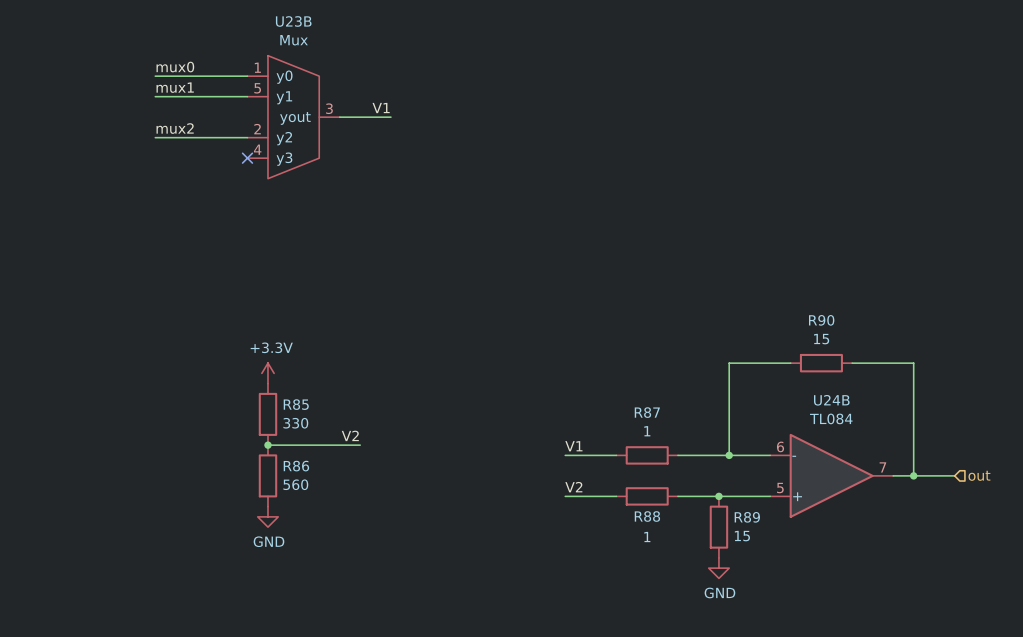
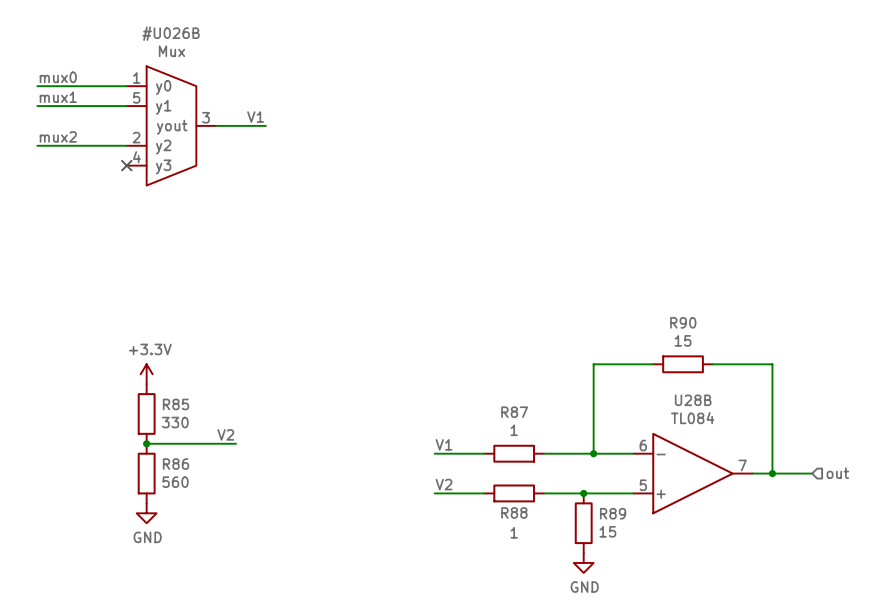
U23B: Mux (293, 117) -> none
#U026B: none -> Mux (171, 125)
U24B name: U24B (831, 400) -> U28B (693, 400)

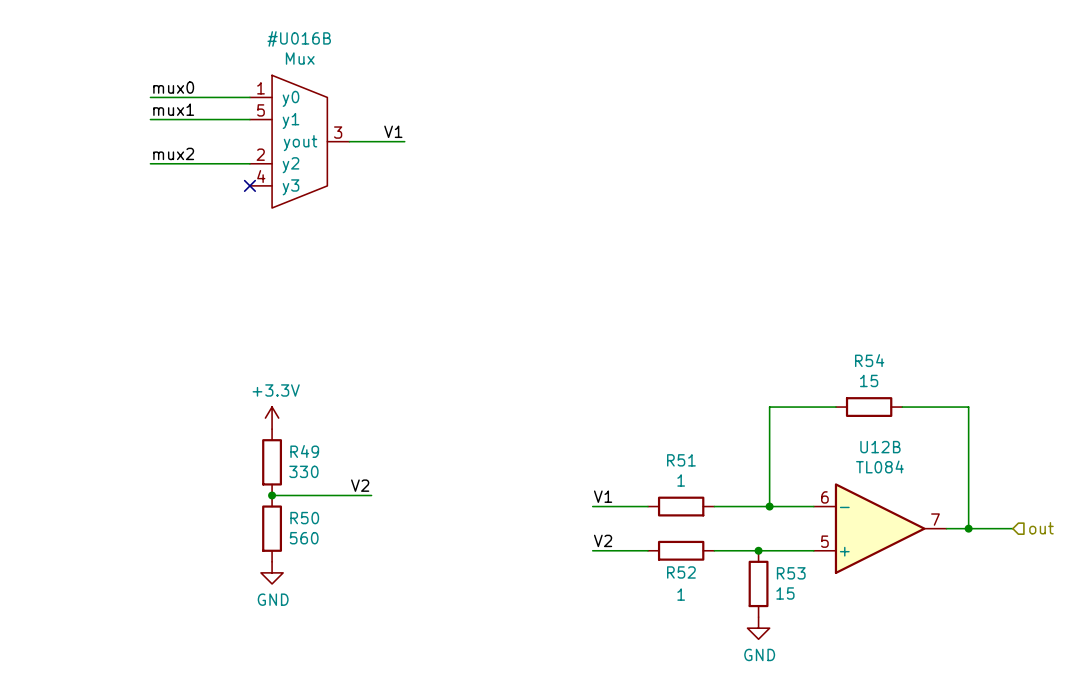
#U026B name: #U026B (171, 33) -> #U016B (299, 38)
R90 name: R90 (683, 322) -> R54 (869, 360)
U28B name: U28B (693, 400) -> U12B (880, 447)
R85 name: R85 (176, 404) -> R49 (304, 451)
R87 name: R87 (514, 412) -> R51 (681, 460)
R86 name: R86 (176, 464) -> R50 (304, 518)
R88 name: R88 (514, 512) -> R52 (681, 572)
R89 name: R89 (613, 513) -> R53 (791, 573)

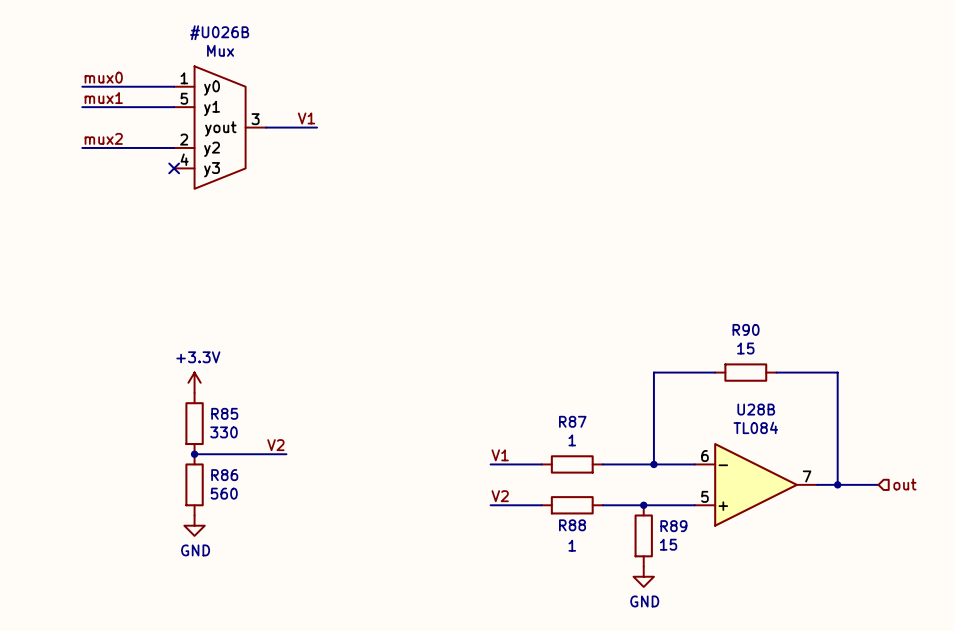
#U016B name: #U016B (299, 38) -> #U026B (219, 32)
R54 name: R54 (869, 360) -> R90 (746, 329)
U12B name: U12B (880, 447) -> U28B (756, 409)
R49 name: R49 (304, 451) -> R85 (224, 413)
R51 name: R51 (681, 460) -> R87 (572, 421)
R50 name: R50 (304, 518) -> R86 (224, 475)
R52 name: R52 (681, 572) -> R88 (572, 525)
R53 name: R53 (791, 573) -> R89 (673, 526)

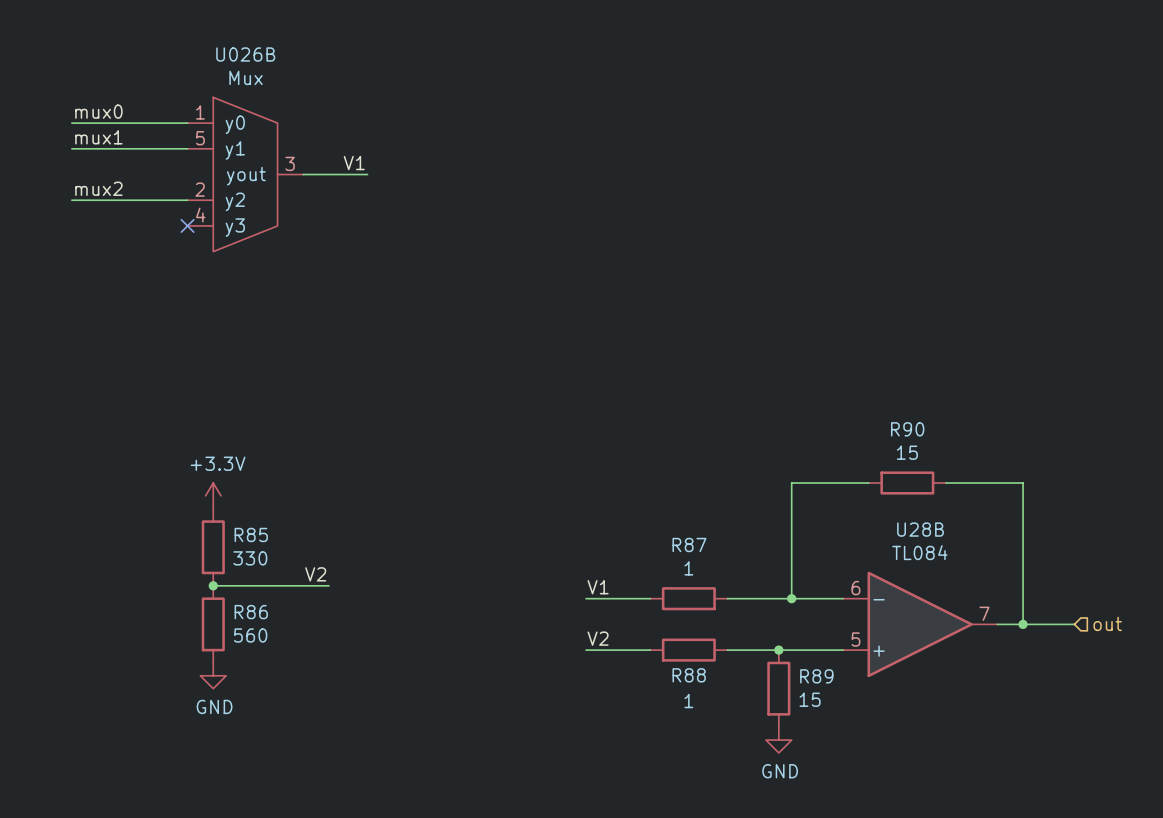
#U026B: Mux (220, 127) -> none
U026B: none -> Mux (245, 174)

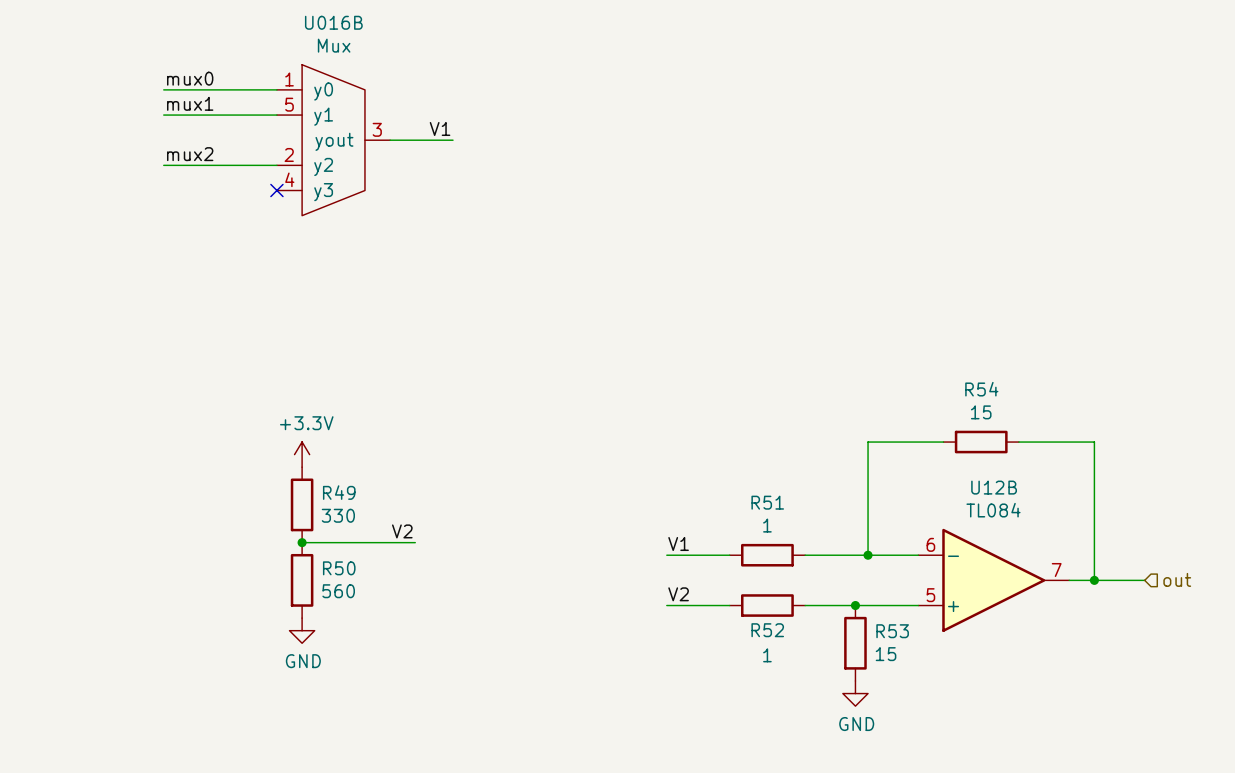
U026B name: U026B (245, 54) -> U016B (333, 22)
R90 name: R90 (907, 429) -> R54 (981, 389)
U28B name: U28B (920, 529) -> U12B (994, 487)
R85 name: R85 (251, 534) -> R49 (339, 492)
R87 name: R87 (689, 544) -> R51 (767, 502)
R86 name: R86 (251, 612) -> R50 (339, 568)
R88 name: R88 (689, 675) -> R52 (767, 630)
R89 name: R89 (816, 676) -> R53 (892, 631)

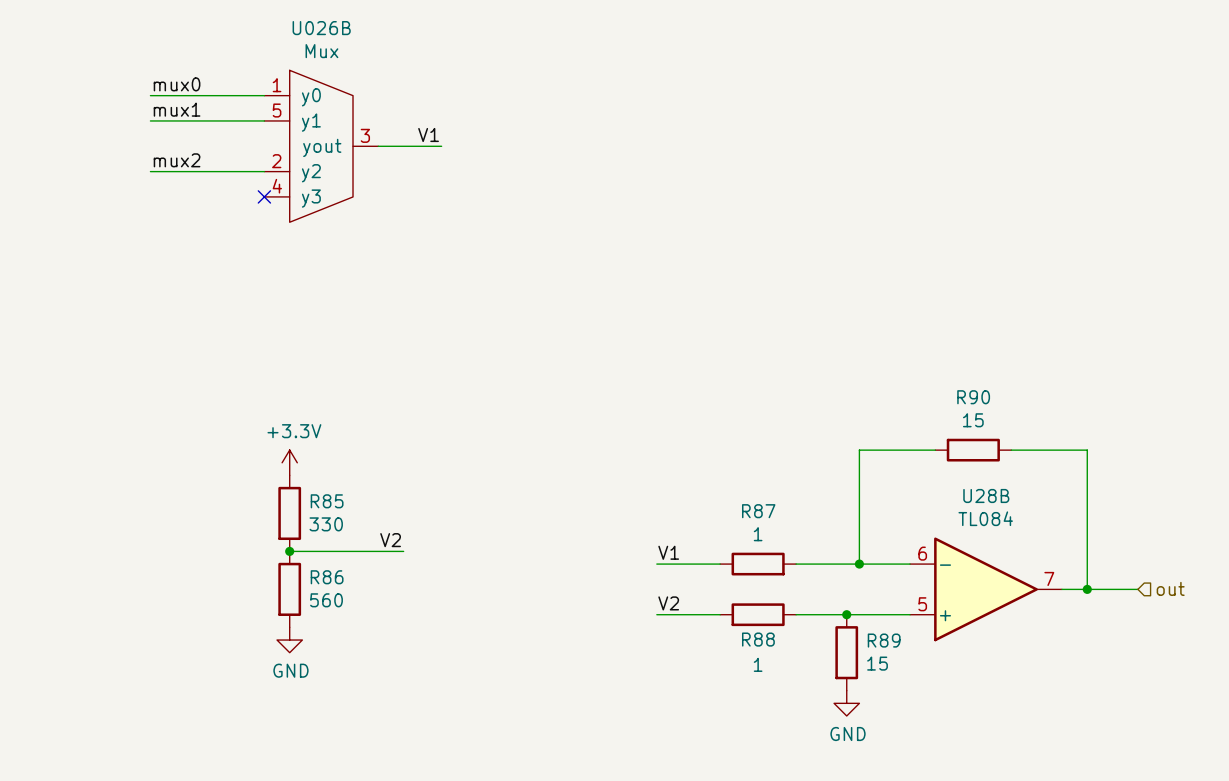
U016B name: U016B (333, 22) -> U026B (321, 28)
R54 name: R54 (981, 389) -> R90 (973, 397)
U12B name: U12B (994, 487) -> U28B (986, 495)
R49 name: R49 (339, 492) -> R85 (327, 501)
R51 name: R51 (767, 502) -> R87 (758, 511)
R50 name: R50 (339, 568) -> R86 (327, 577)
R52 name: R52 (767, 630) -> R88 (758, 639)
R53 name: R53 (892, 631) -> R89 (884, 640)

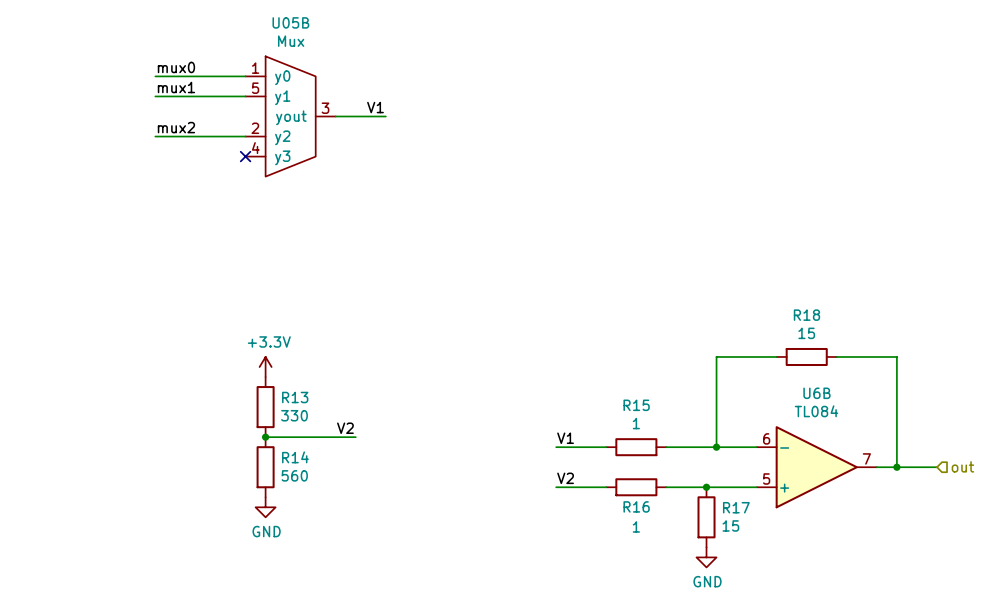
U026B name: U026B (321, 28) -> U05B (290, 22)
R90 name: R90 (973, 397) -> R18 (806, 315)
U28B name: U28B (986, 495) -> U6B (816, 393)
R85 name: R85 (327, 501) -> R13 (295, 397)
R87 name: R87 (758, 511) -> R15 (636, 405)
R86 name: R86 (327, 577) -> R14 (295, 457)
R88 name: R88 (758, 639) -> R16 (636, 506)
R89 name: R89 (884, 640) -> R17 (736, 507)

